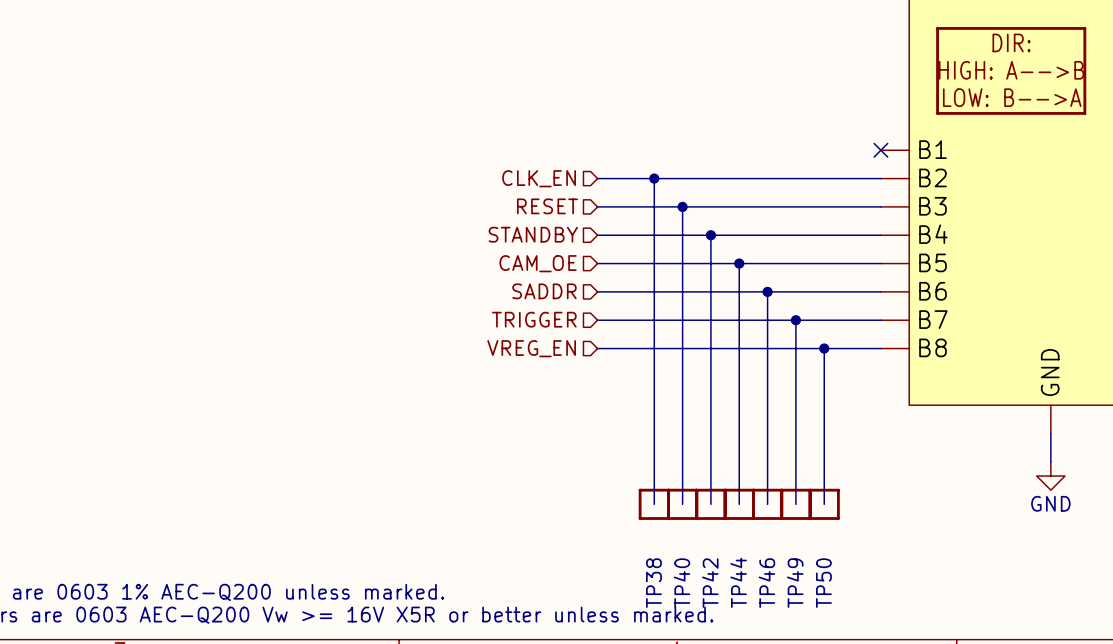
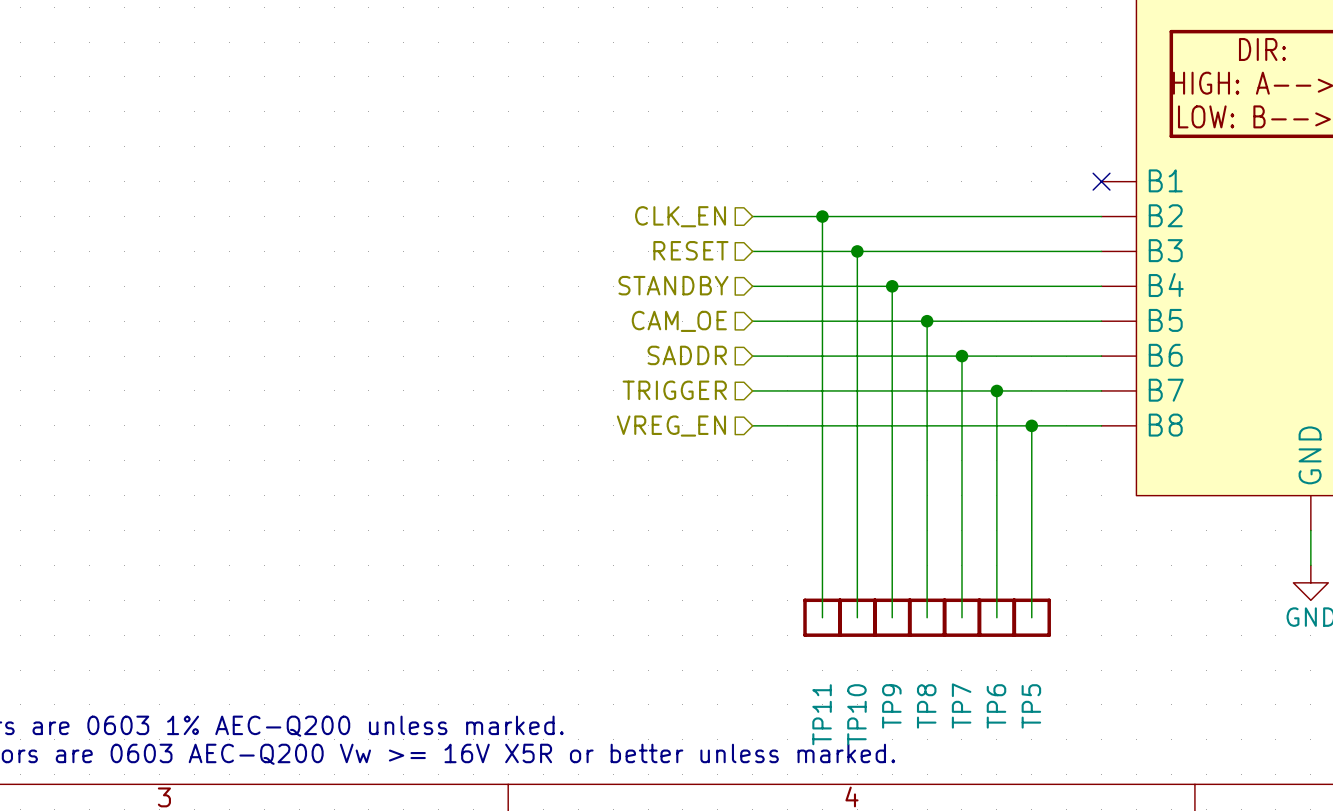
TP44 name: TP44 (738, 582) -> TP8 (926, 706)
TP38 name: TP38 (653, 583) -> TP11 (822, 714)
TP40 name: TP40 (681, 583) -> TP10 (856, 714)
TP42 name: TP42 (710, 583) -> TP9 (891, 706)
TP46 name: TP46 (766, 583) -> TP7 (961, 705)
TP49 name: TP49 (795, 583) -> TP6 (996, 706)
TP50 name: TP50 (823, 583) -> TP5 (1031, 706)

